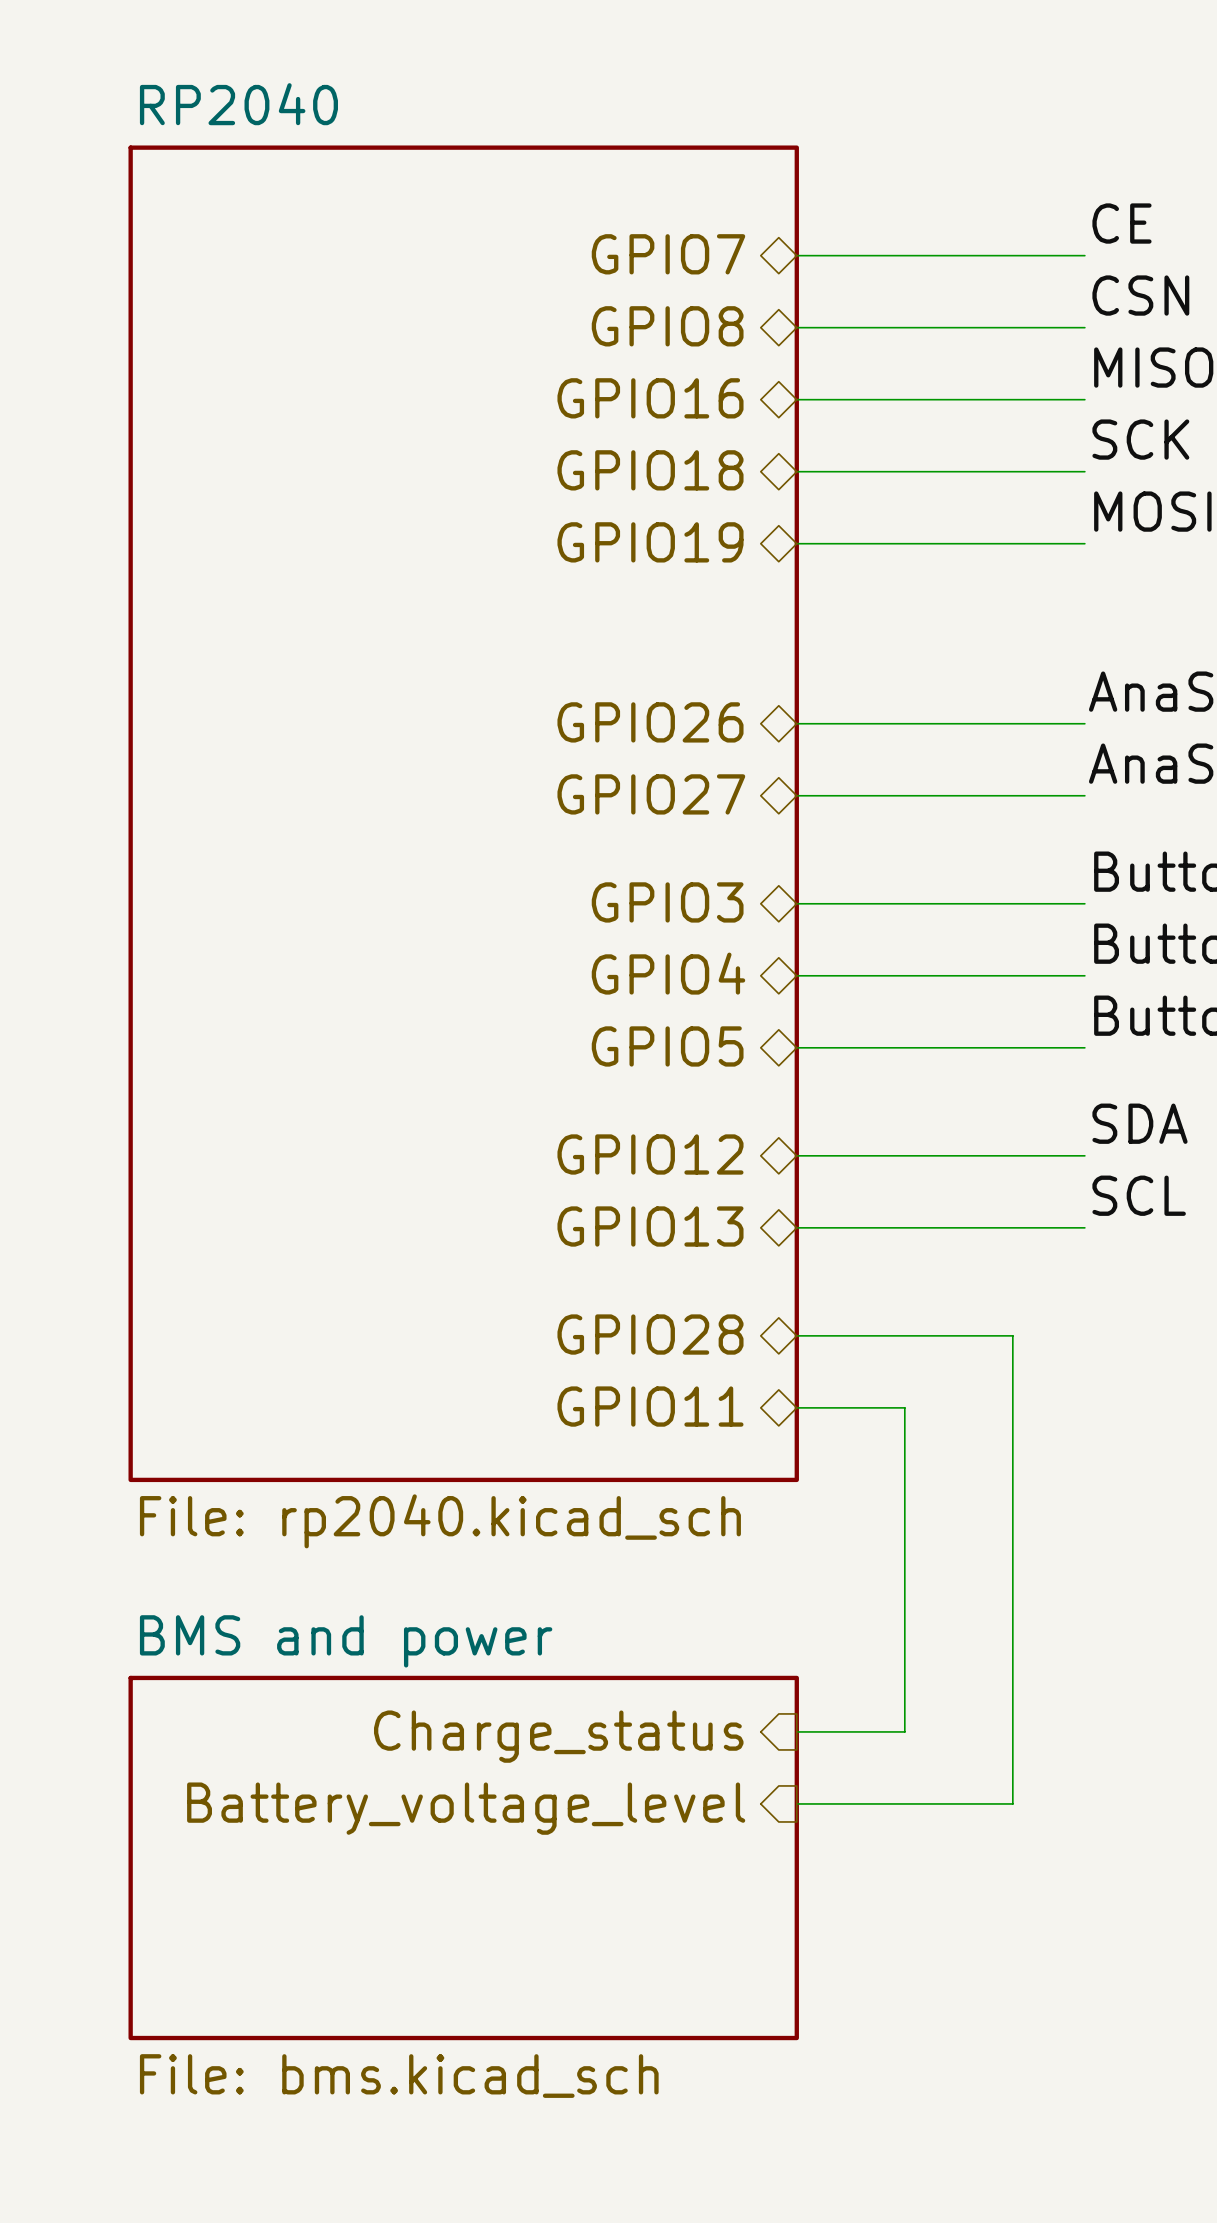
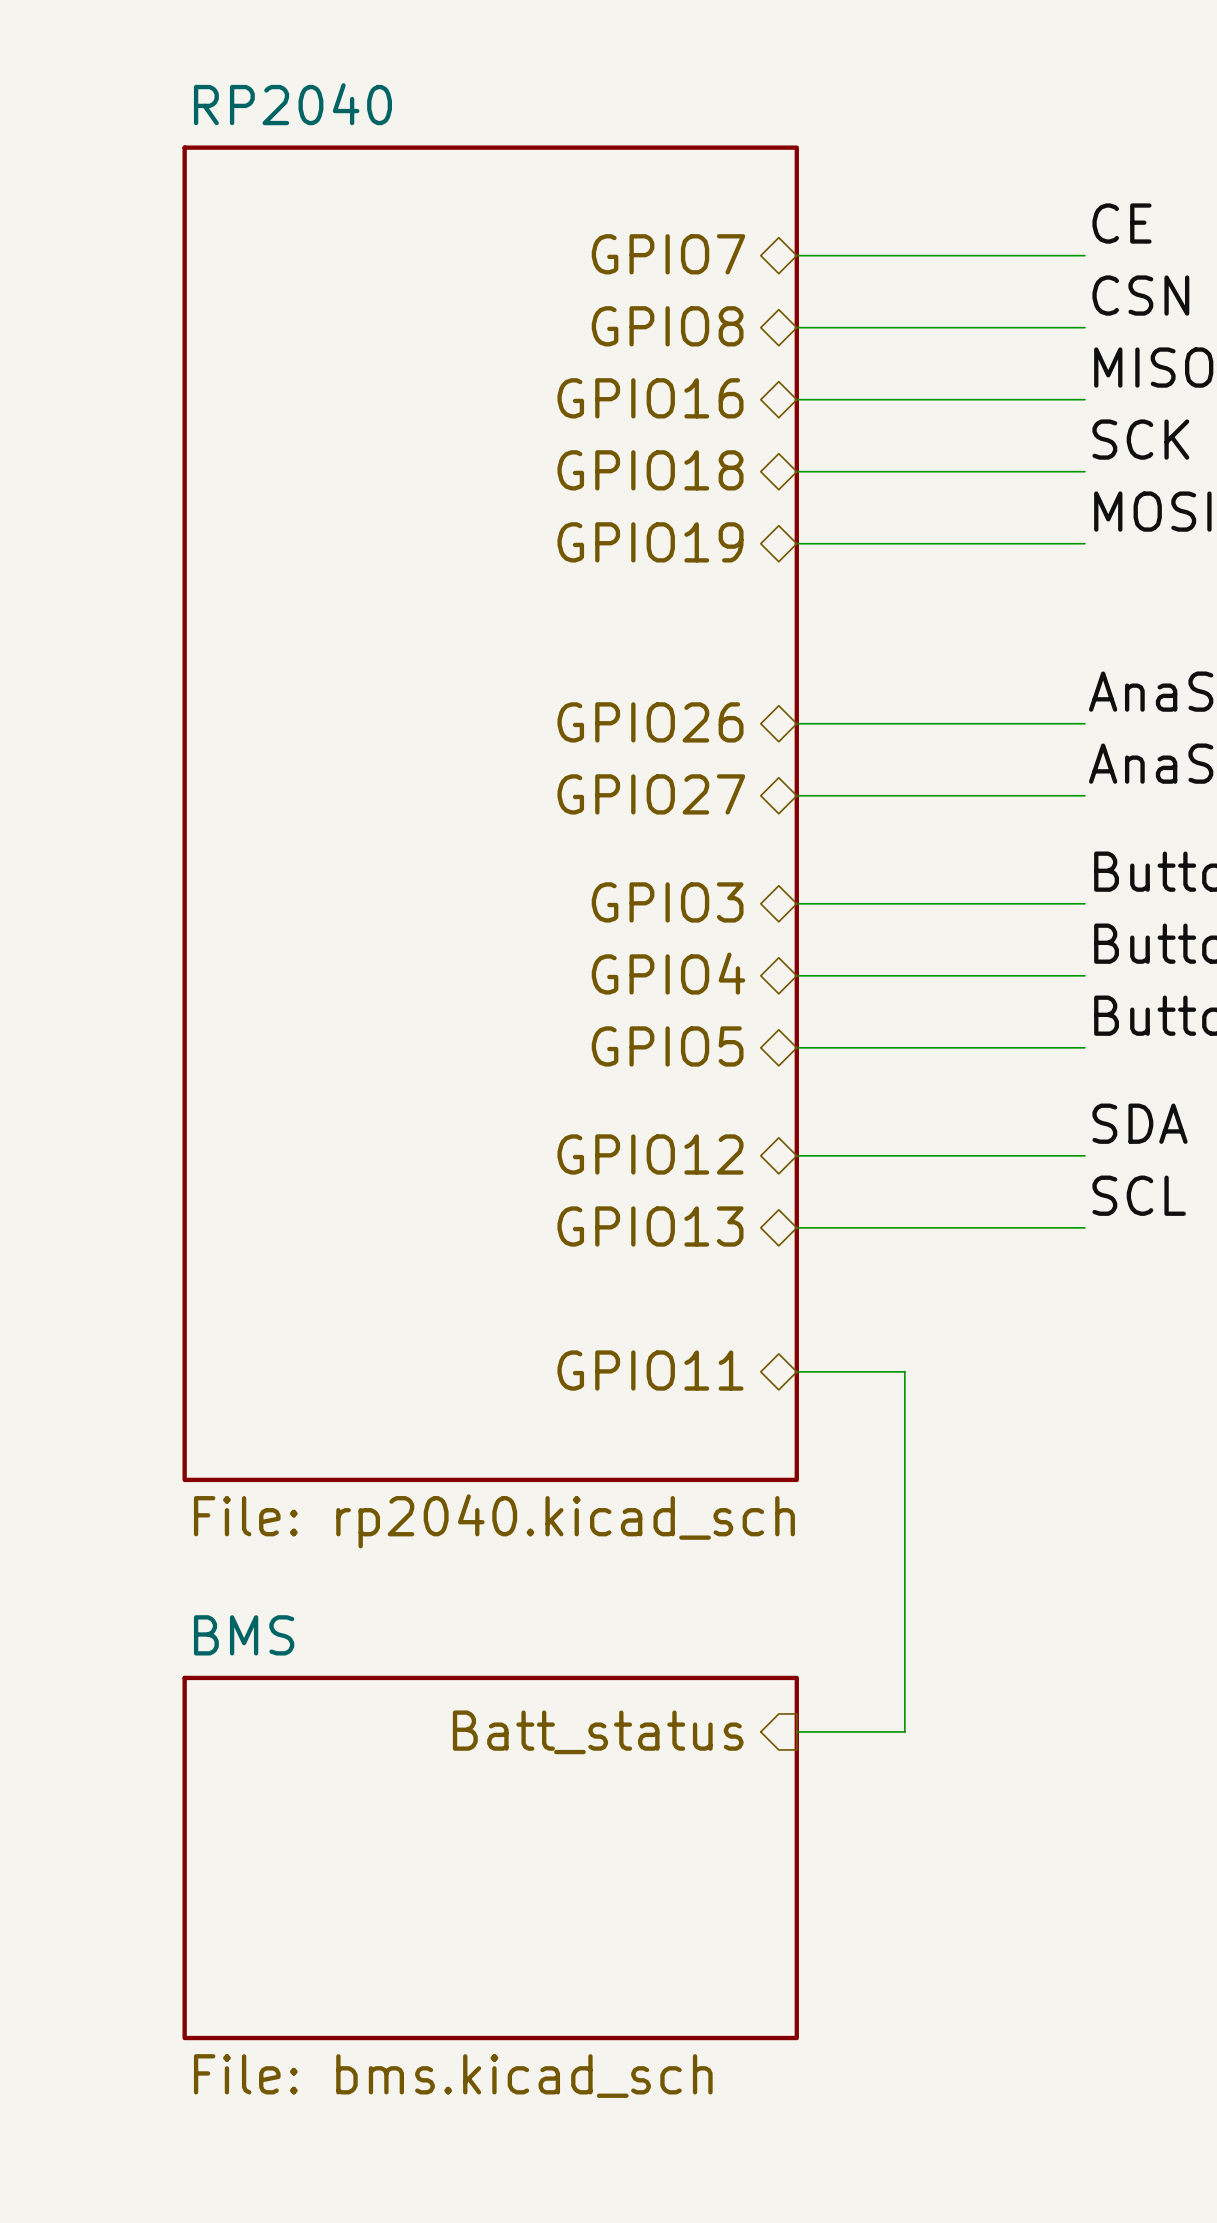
sheet RP2040 shape: [128, 145, 799, 1483] -> [182, 145, 799, 1483]
hierarchical label: GPIO28 (650, 1334) -> none
wire: (796, 1335) (1012, 1335) (1012, 1803) (796, 1803) -> none
hierarchical label position: GPIO11 (650, 1406) -> GPIO11 (650, 1370)
wire: (796, 1407) (904, 1407) -> (796, 1371) (904, 1371) (904, 1407)
hierarchical label: Charge_status (558, 1736) -> Batt_status (598, 1732)
hierarchical label: Battery_voltage_level (466, 1808) -> none
sheet BMS and power: File: bms.kicad_sch (463, 1857) -> none
sheet BMS: none -> File: bms.kicad_sch (490, 1857)

